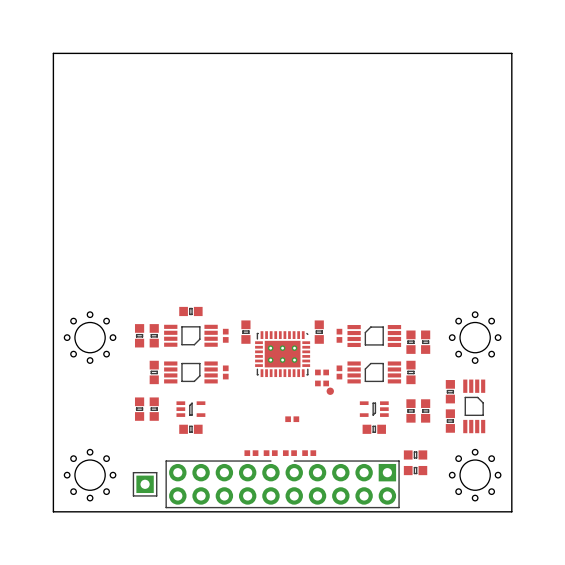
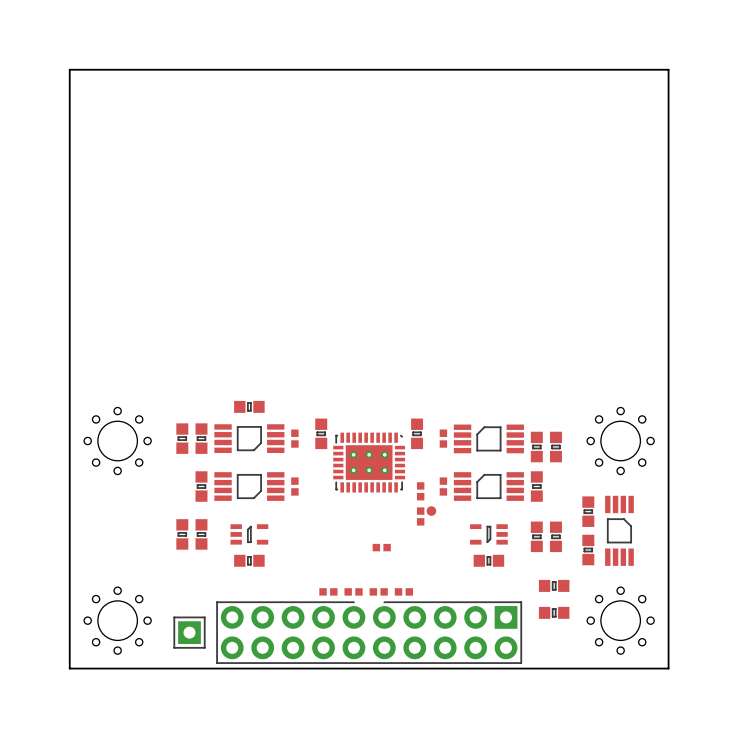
part: (322, 372) -> none
part: none -> (420, 491)
part: (322, 383) -> none
part: none -> (420, 516)
part: none -> (554, 585)
part: (415, 454) -> none
part: none -> (554, 612)
part: (415, 470) -> none

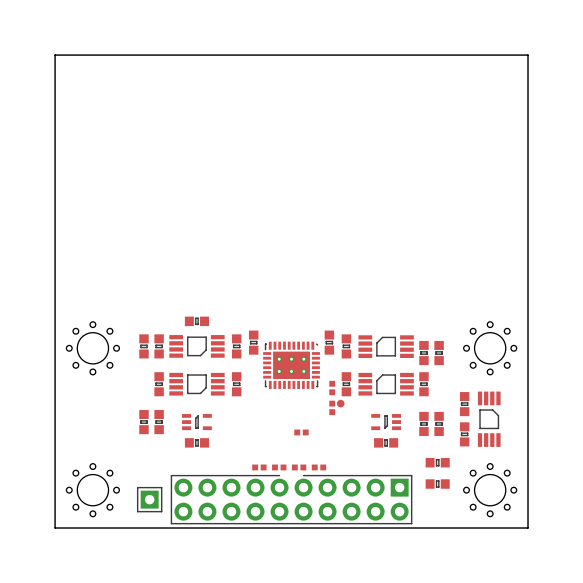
part footprint: [291, 429, 299, 448] -> [231, 334, 242, 359]
part footprint: [439, 429, 448, 448] -> [341, 334, 352, 359]
part footprint: [291, 477, 299, 496] -> [231, 372, 242, 397]
part footprint: [439, 477, 448, 496] -> [341, 372, 352, 397]

